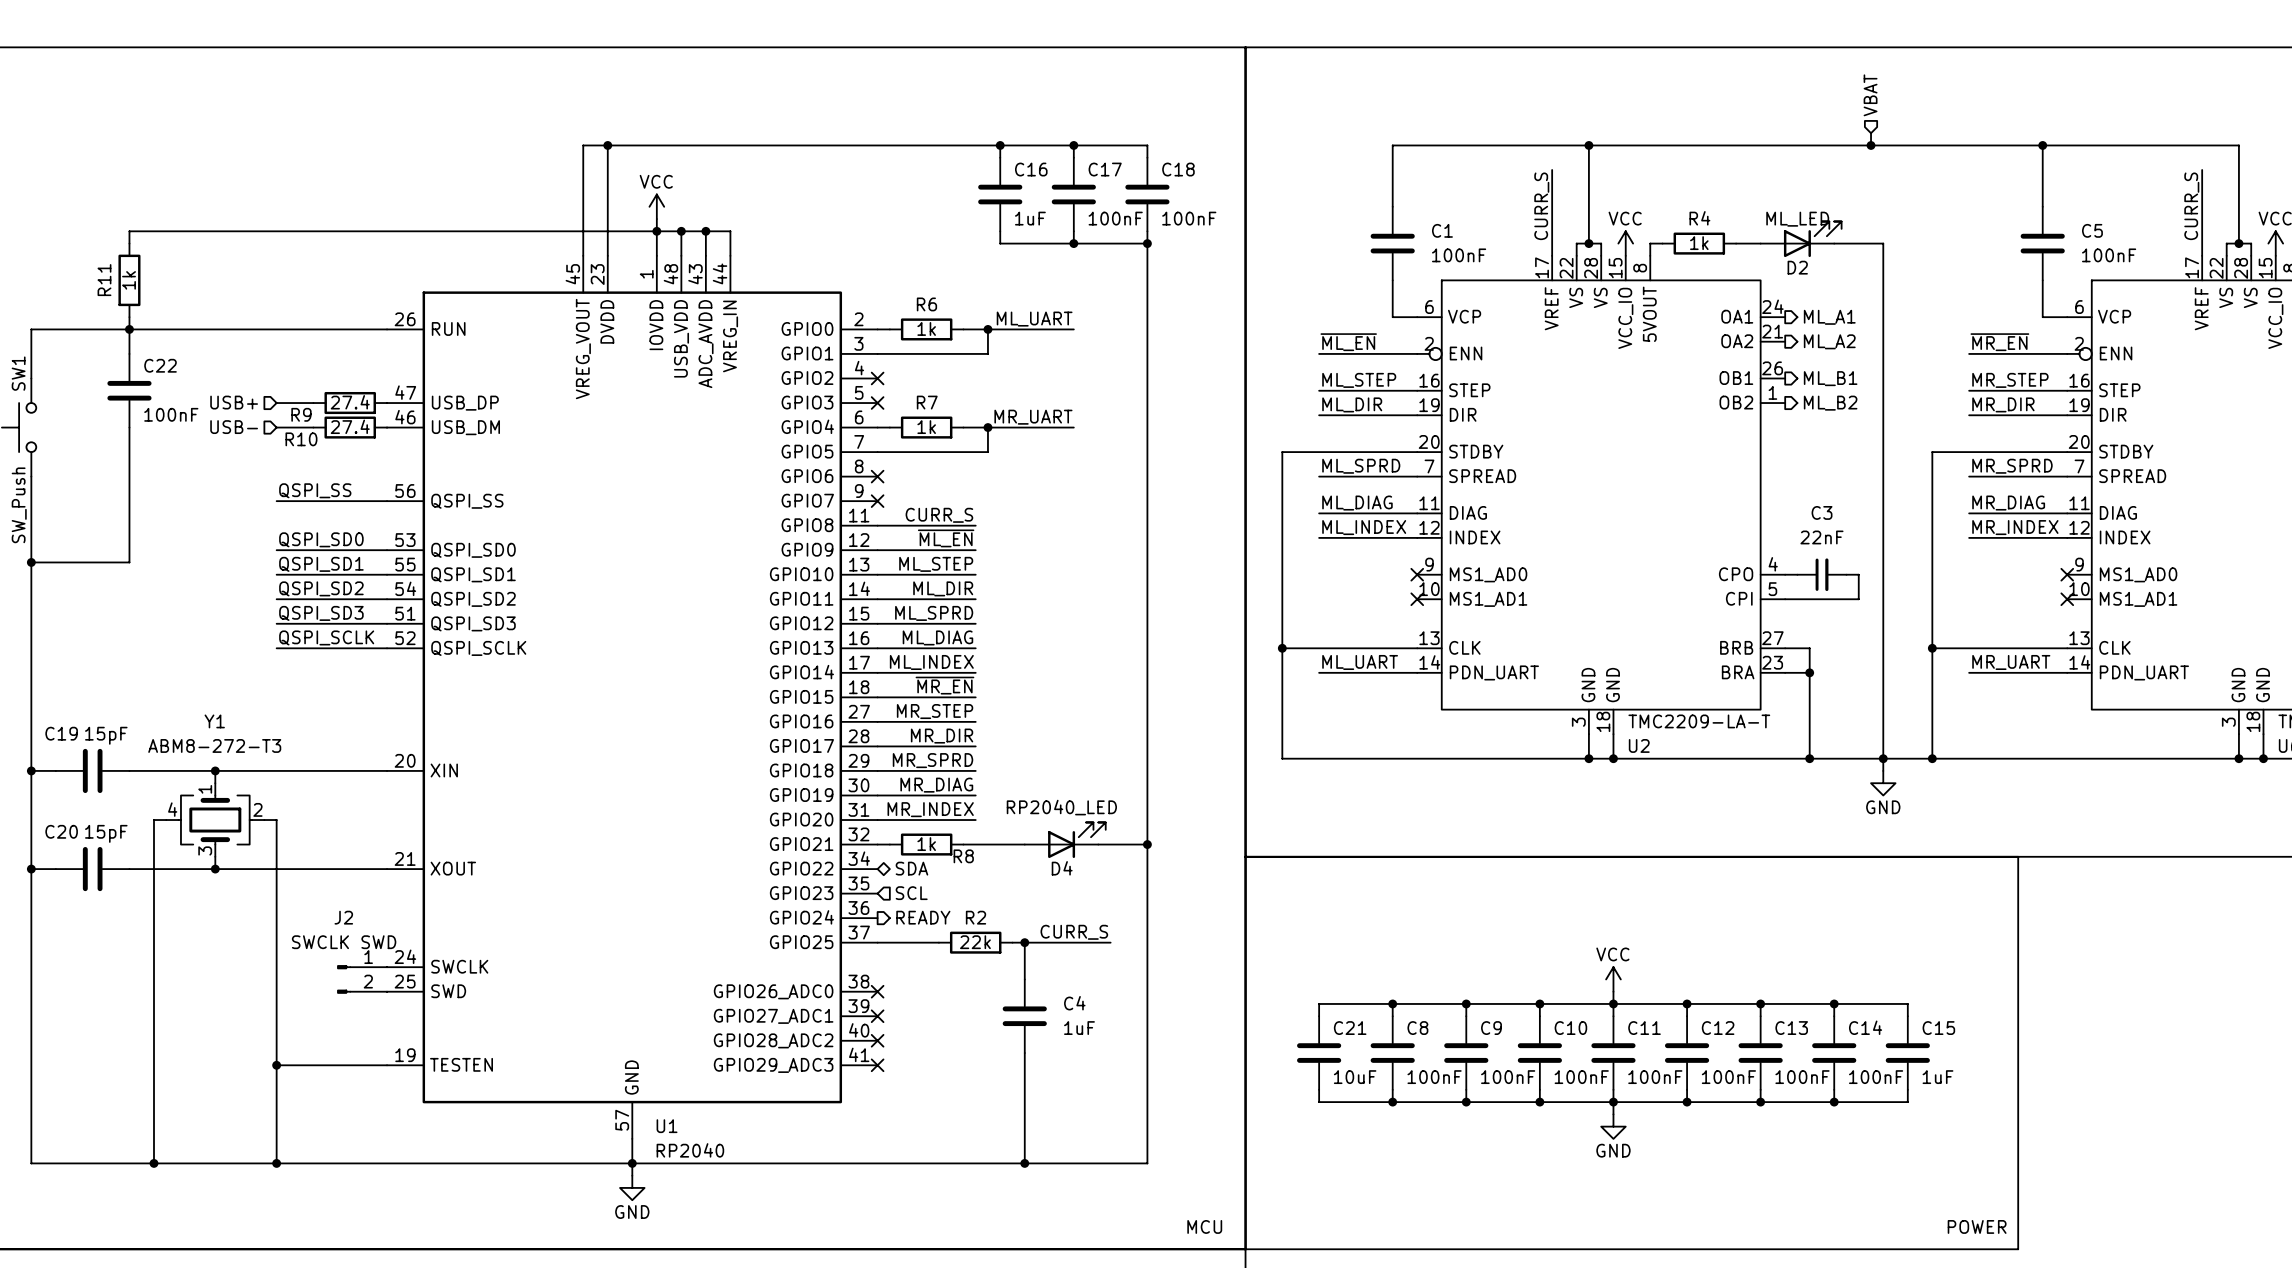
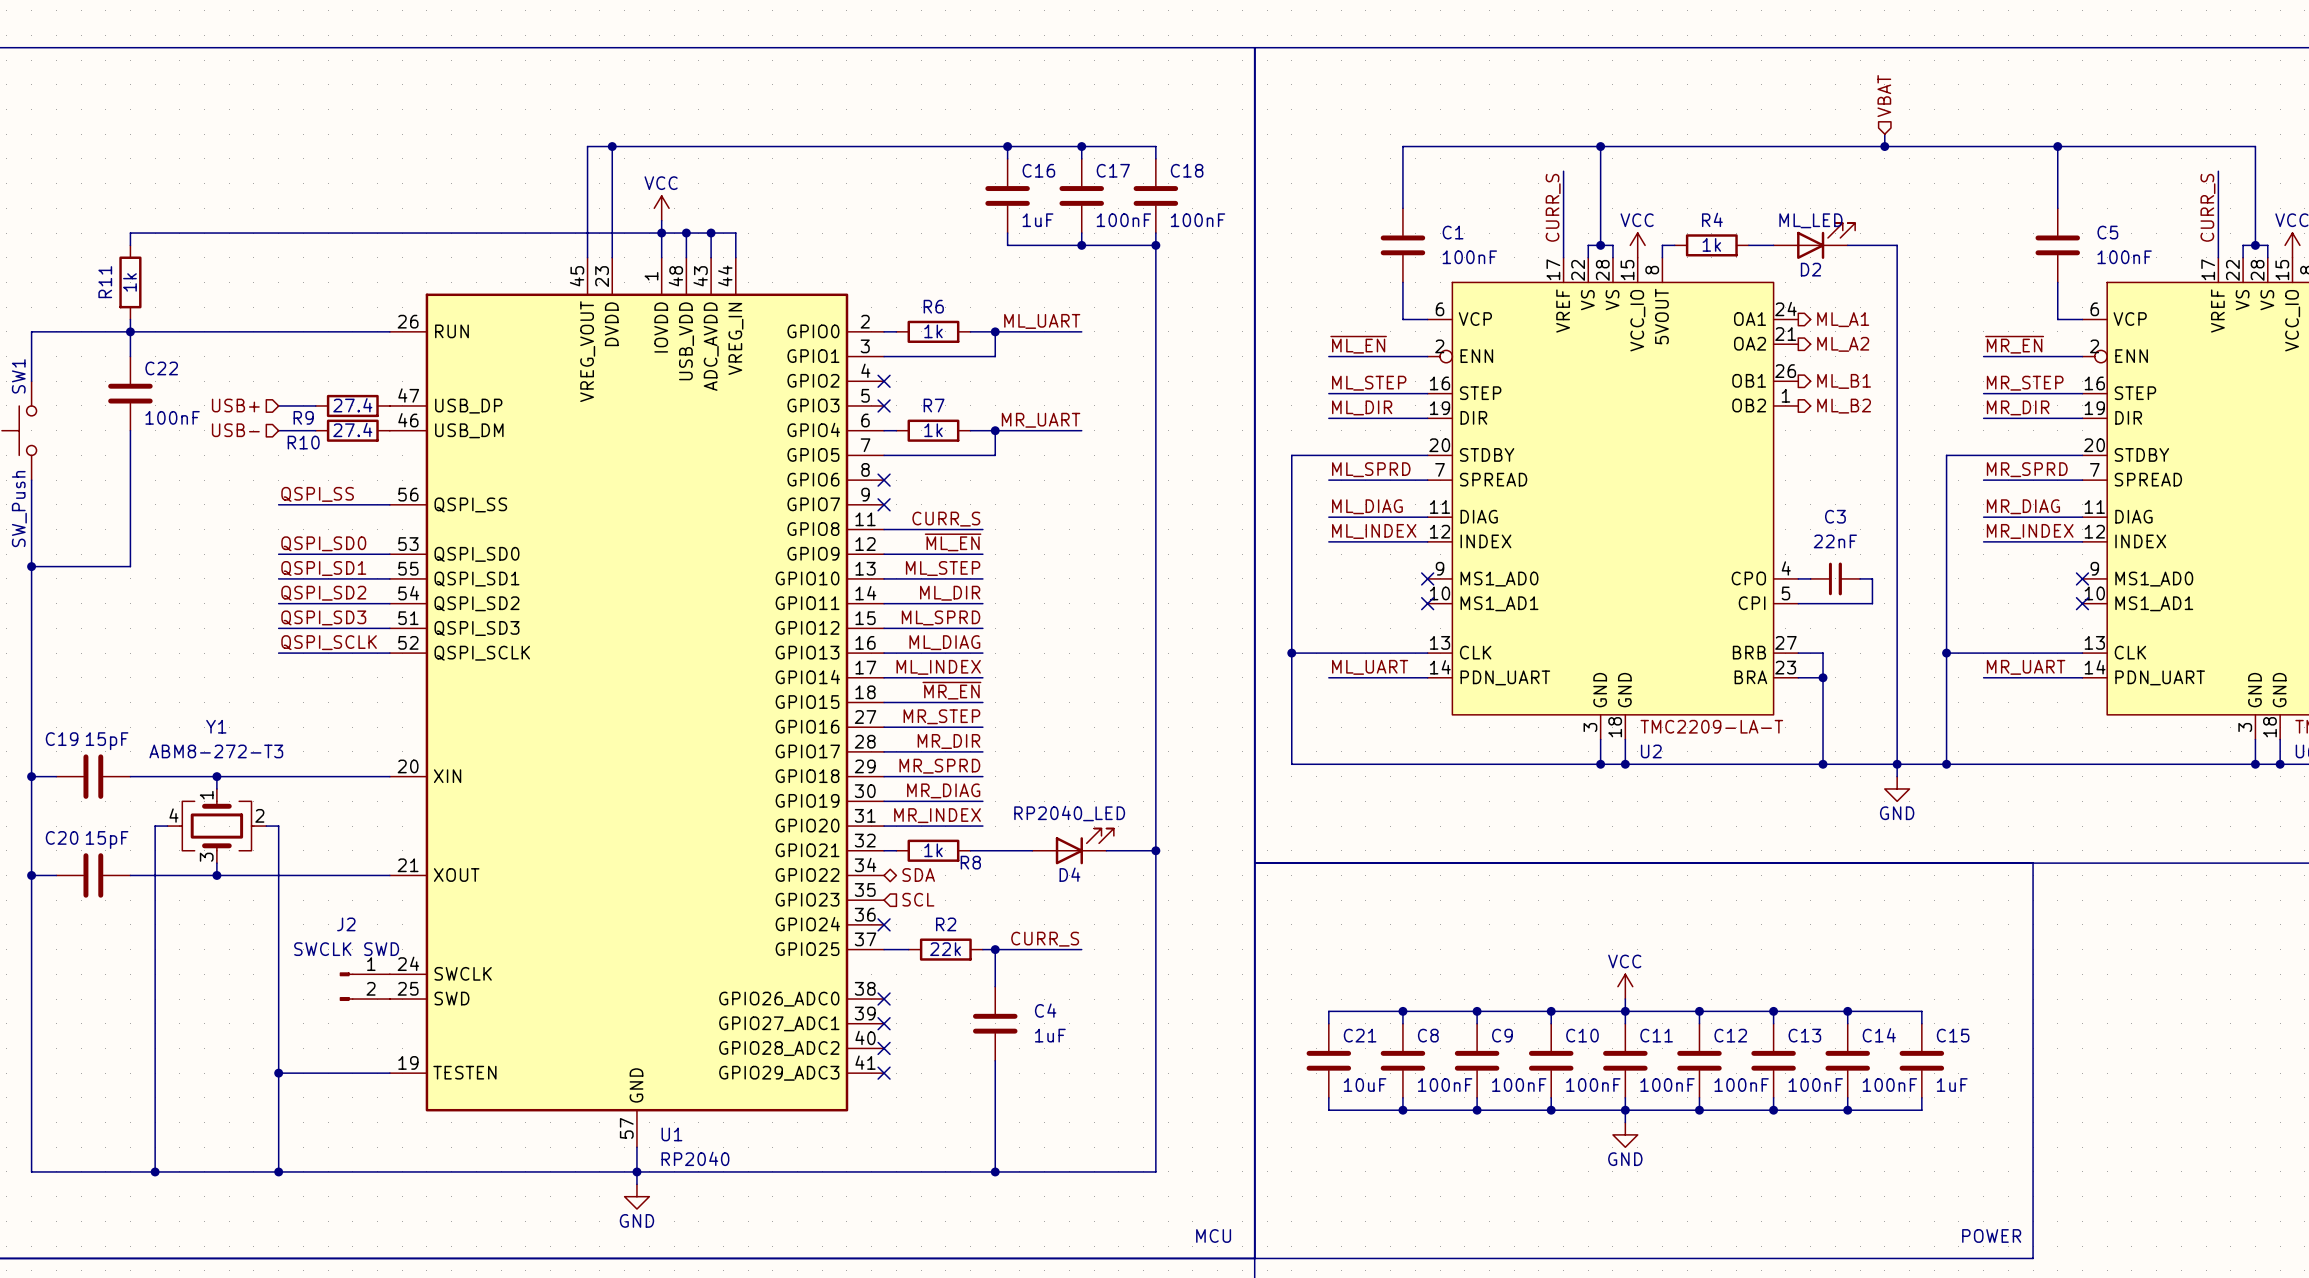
hierarchical label: READY (923, 917) -> none
no-connect mark: none -> (884, 924)
label position: CURR_S (1074, 932) -> CURR_S (1045, 939)
wire: (902, 942) (938, 942) -> (982, 949) (1019, 949)
R2 position: (975, 942) -> (945, 949)
wire: (1024, 942) (1024, 979) -> (995, 949) (995, 986)
junction position: (1024, 942) -> (995, 949)
wire: (1073, 942) (1110, 942) -> none
C4 position: (1024, 1016) -> (995, 1023)
wire: (1024, 1053) (1024, 1163) -> (995, 1060) (995, 1171)
junction position: (1024, 1163) -> (995, 1171)

